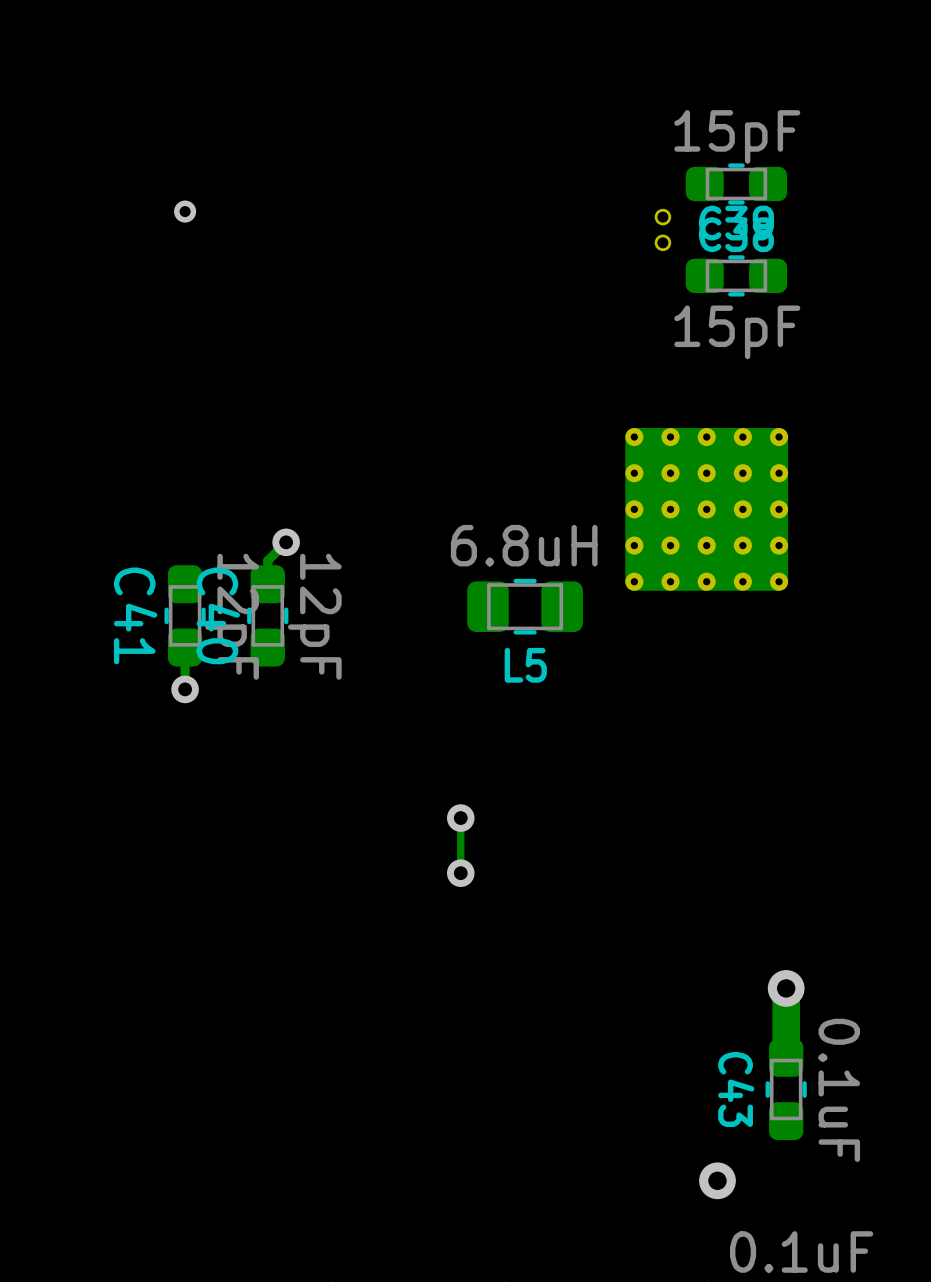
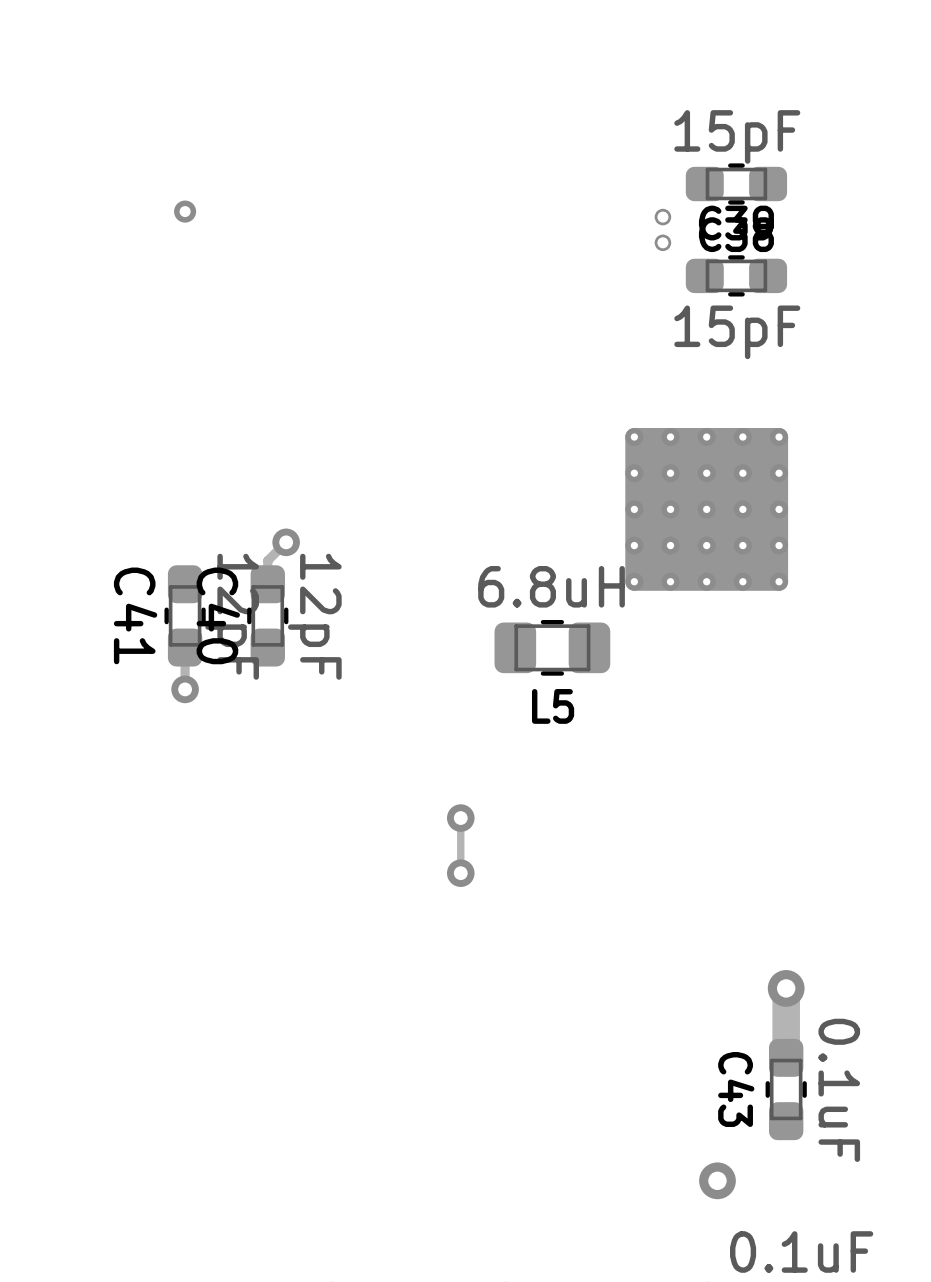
L5 position: (525, 606) -> (552, 647)

